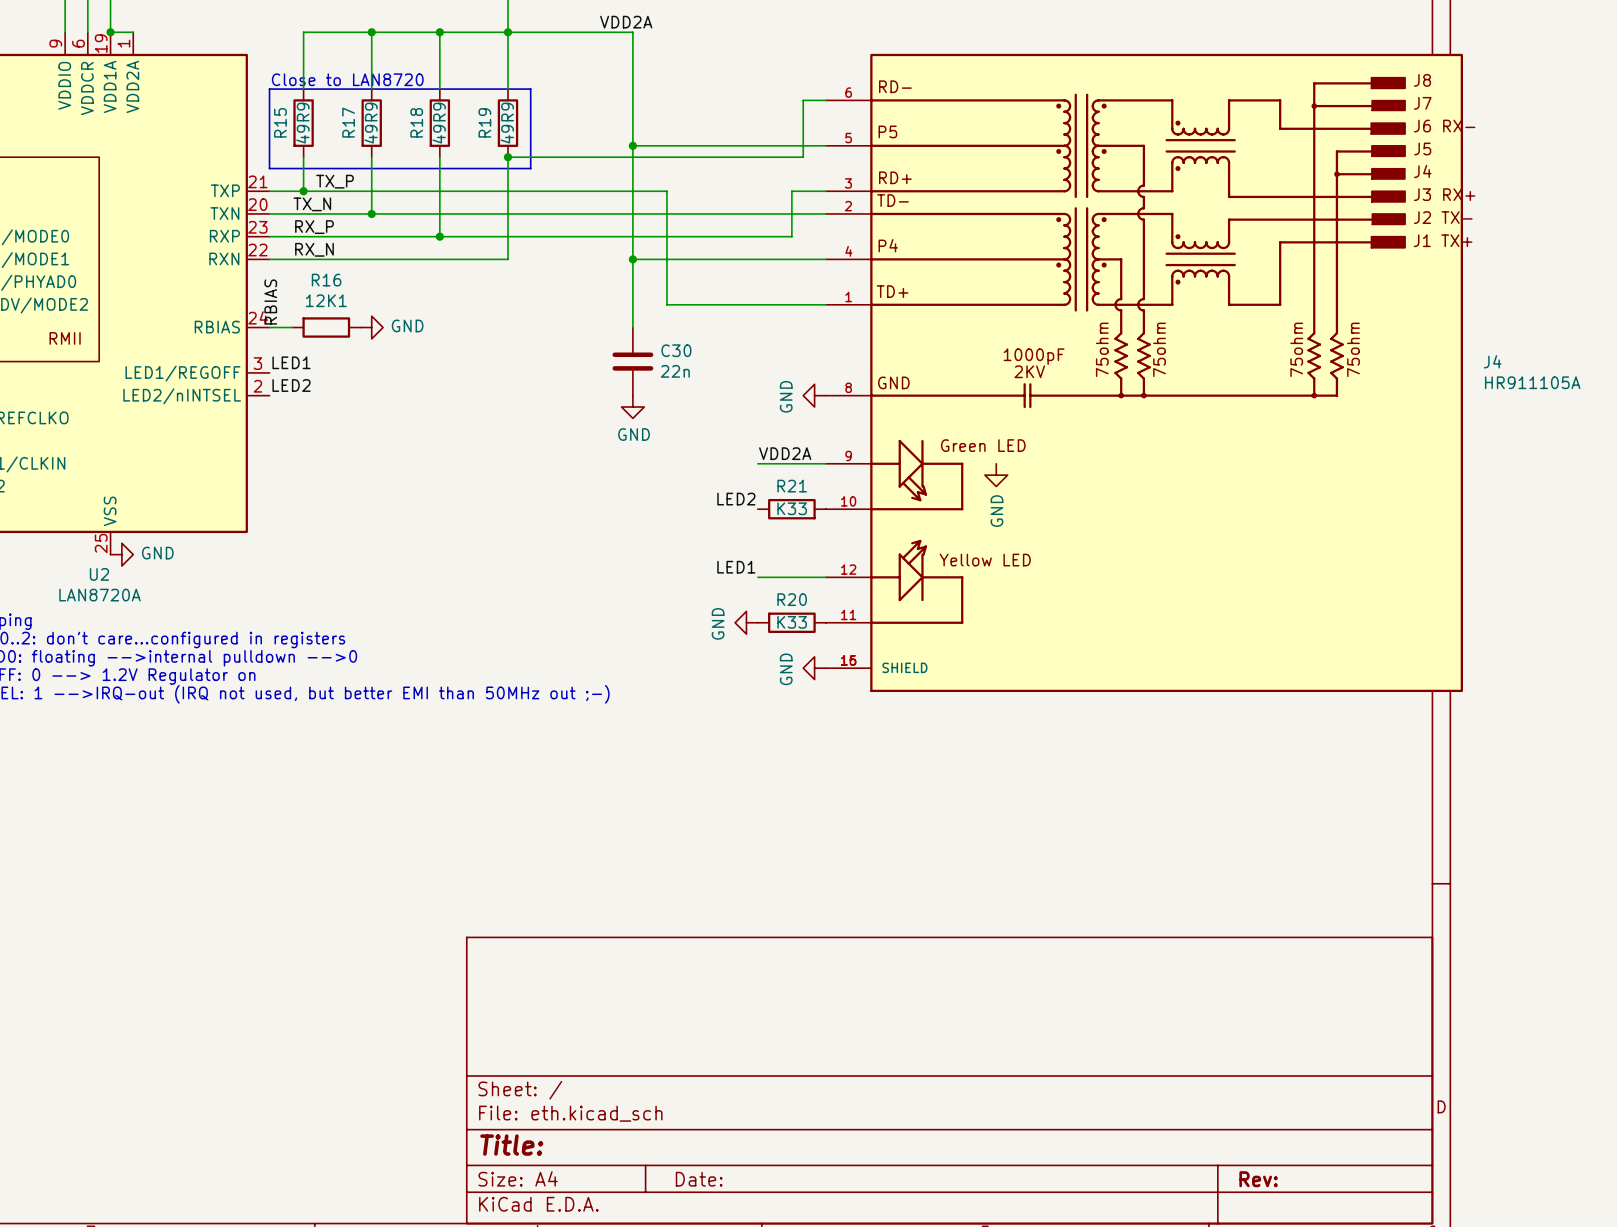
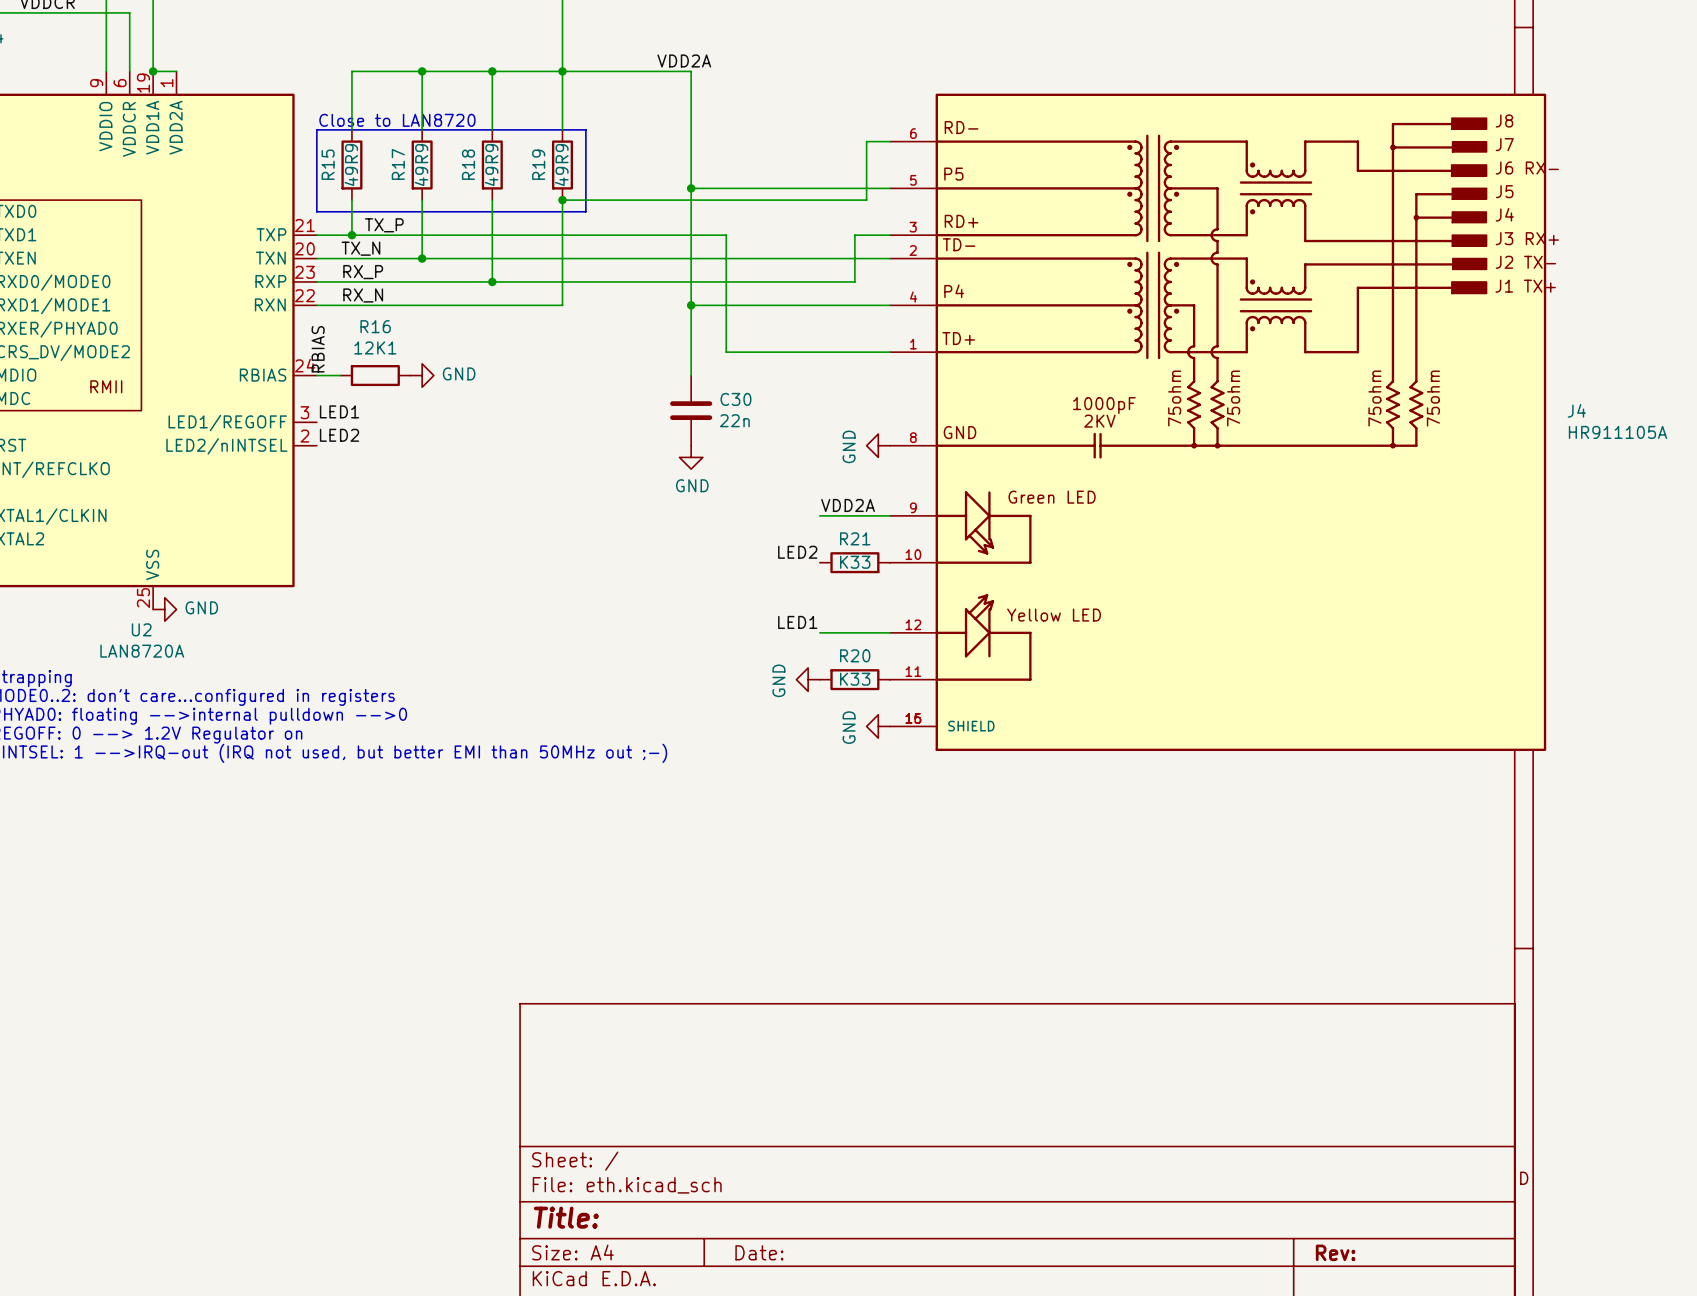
power symbol: GND (996, 475) -> none

